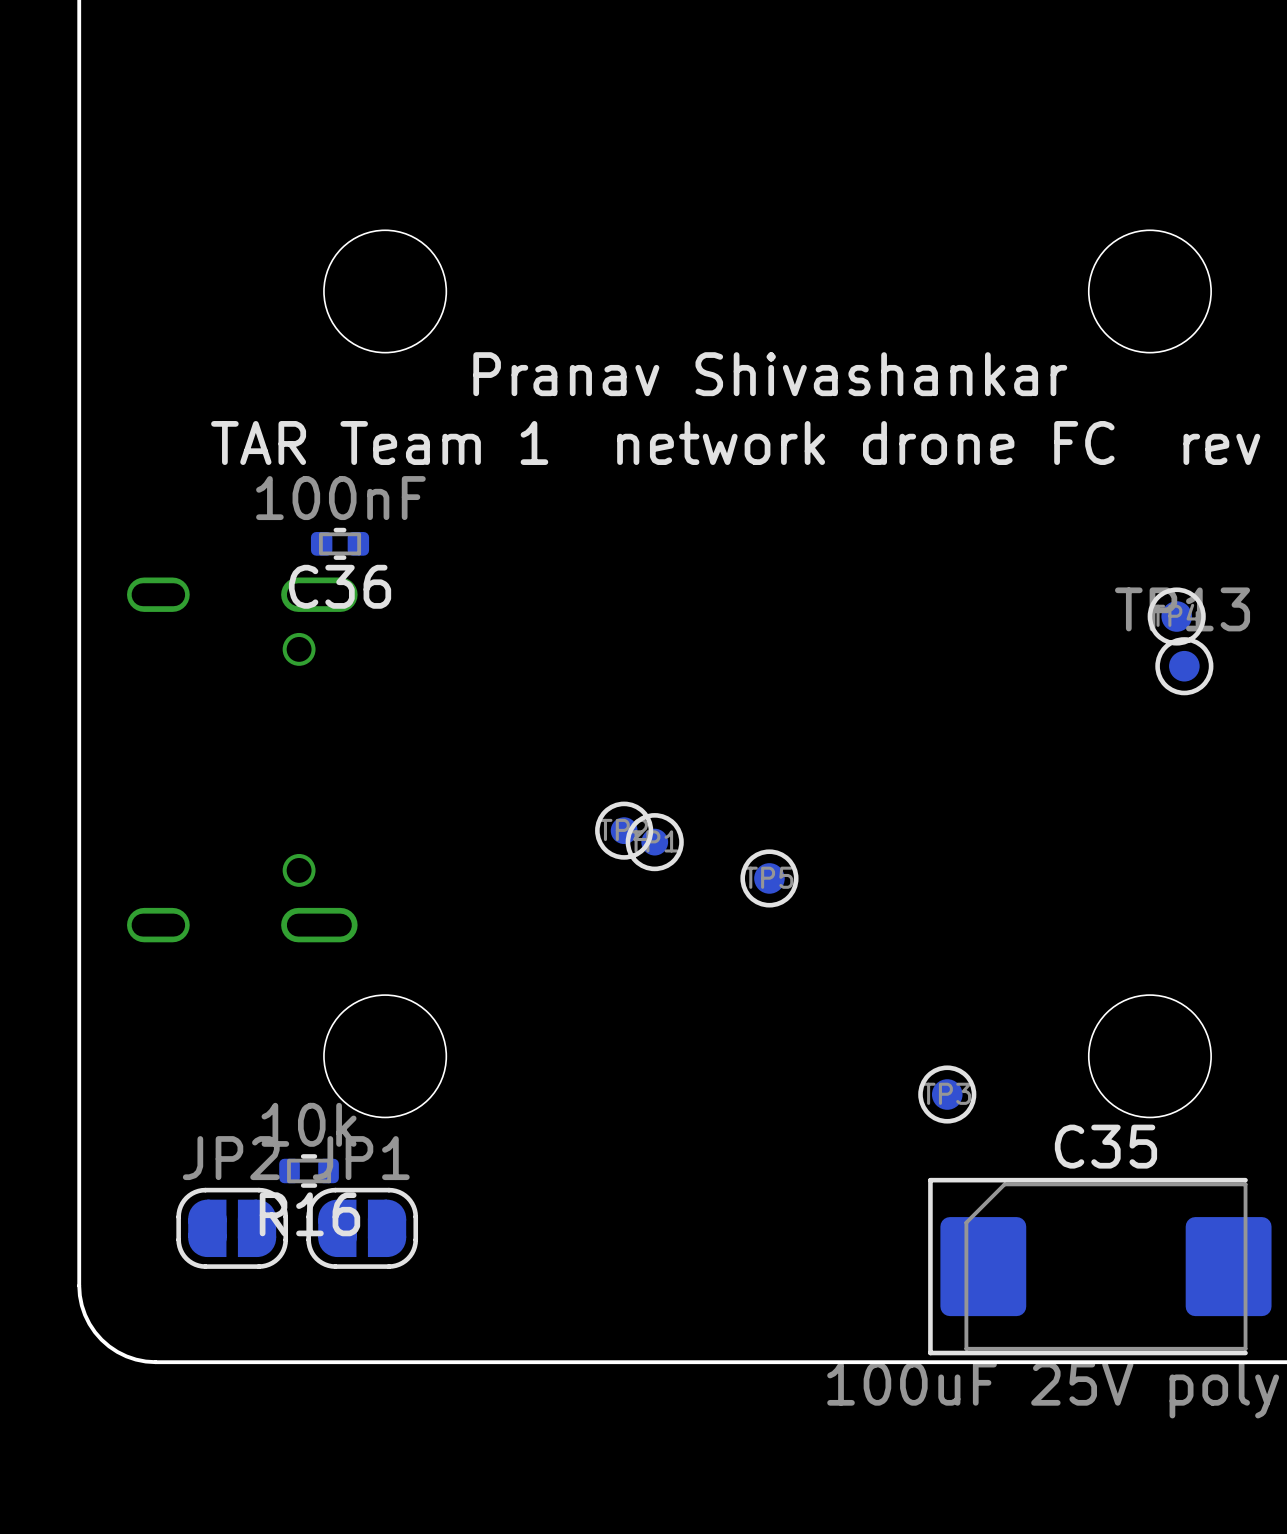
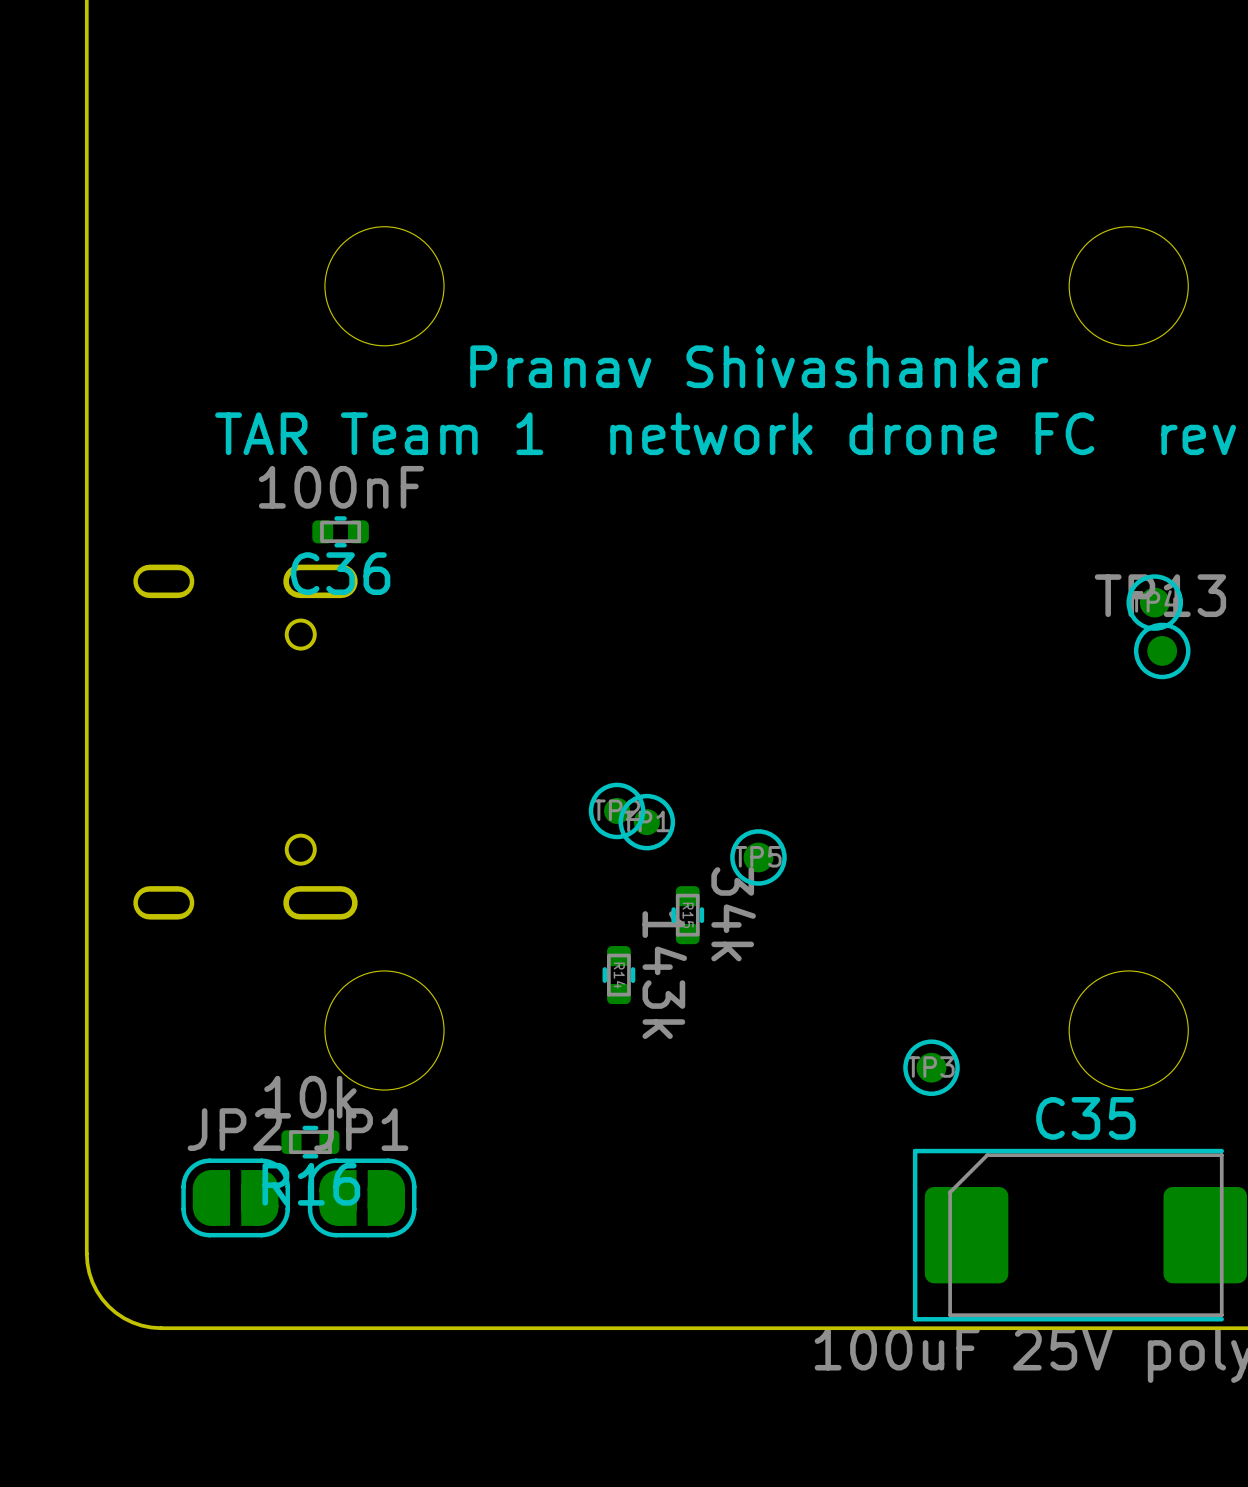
R15: none -> 34k (687, 915)
R14: none -> 143k (618, 975)

